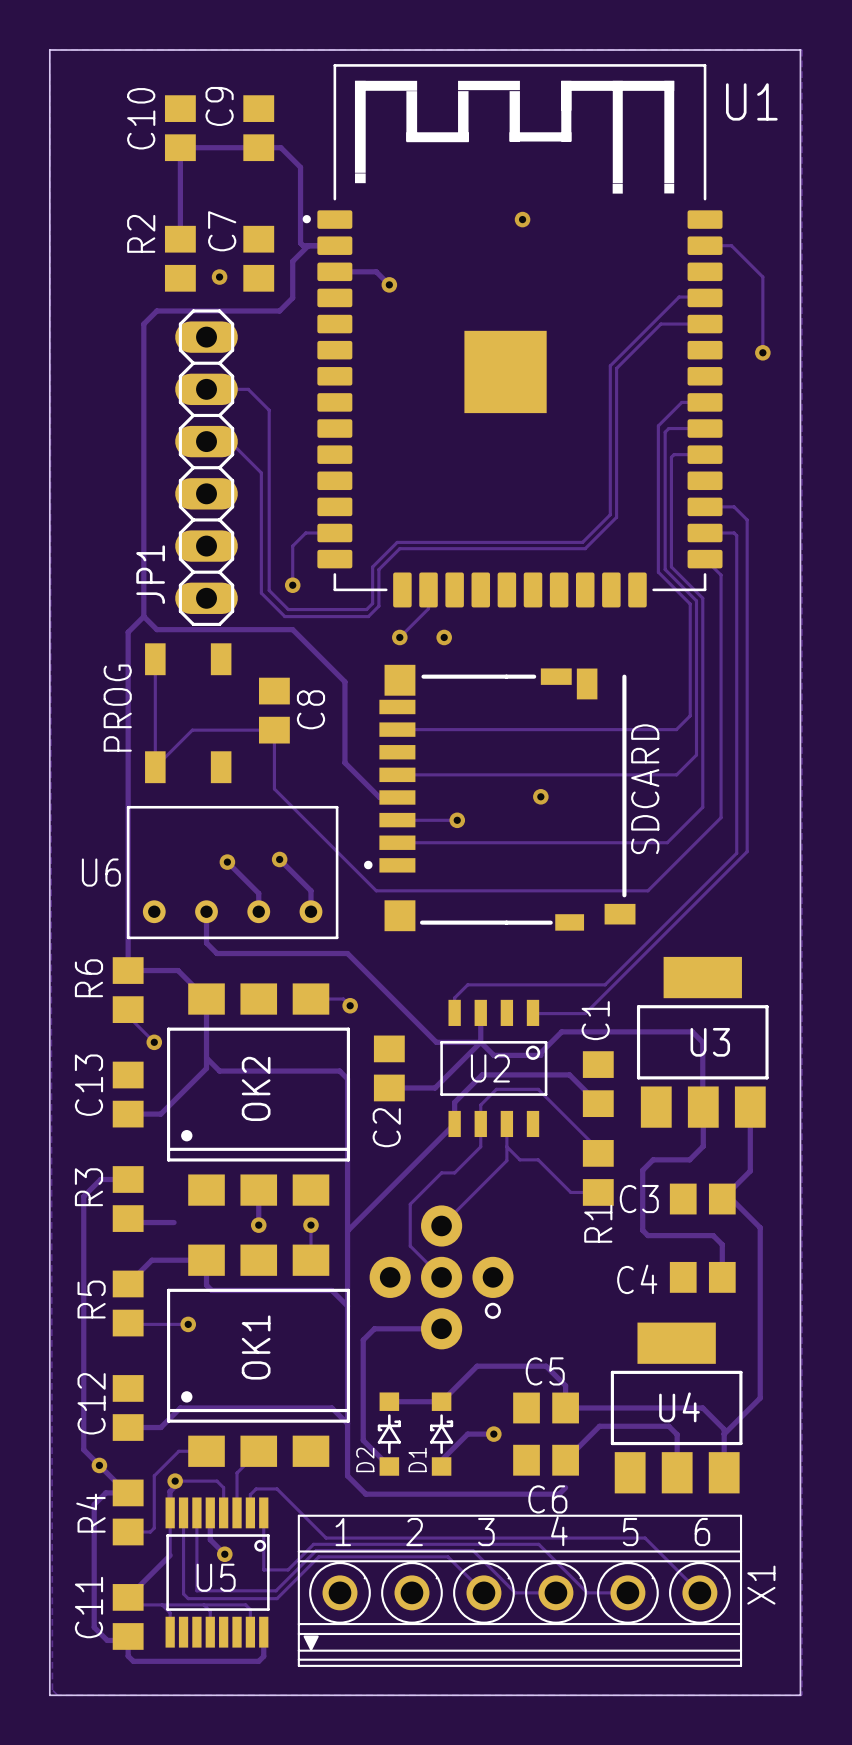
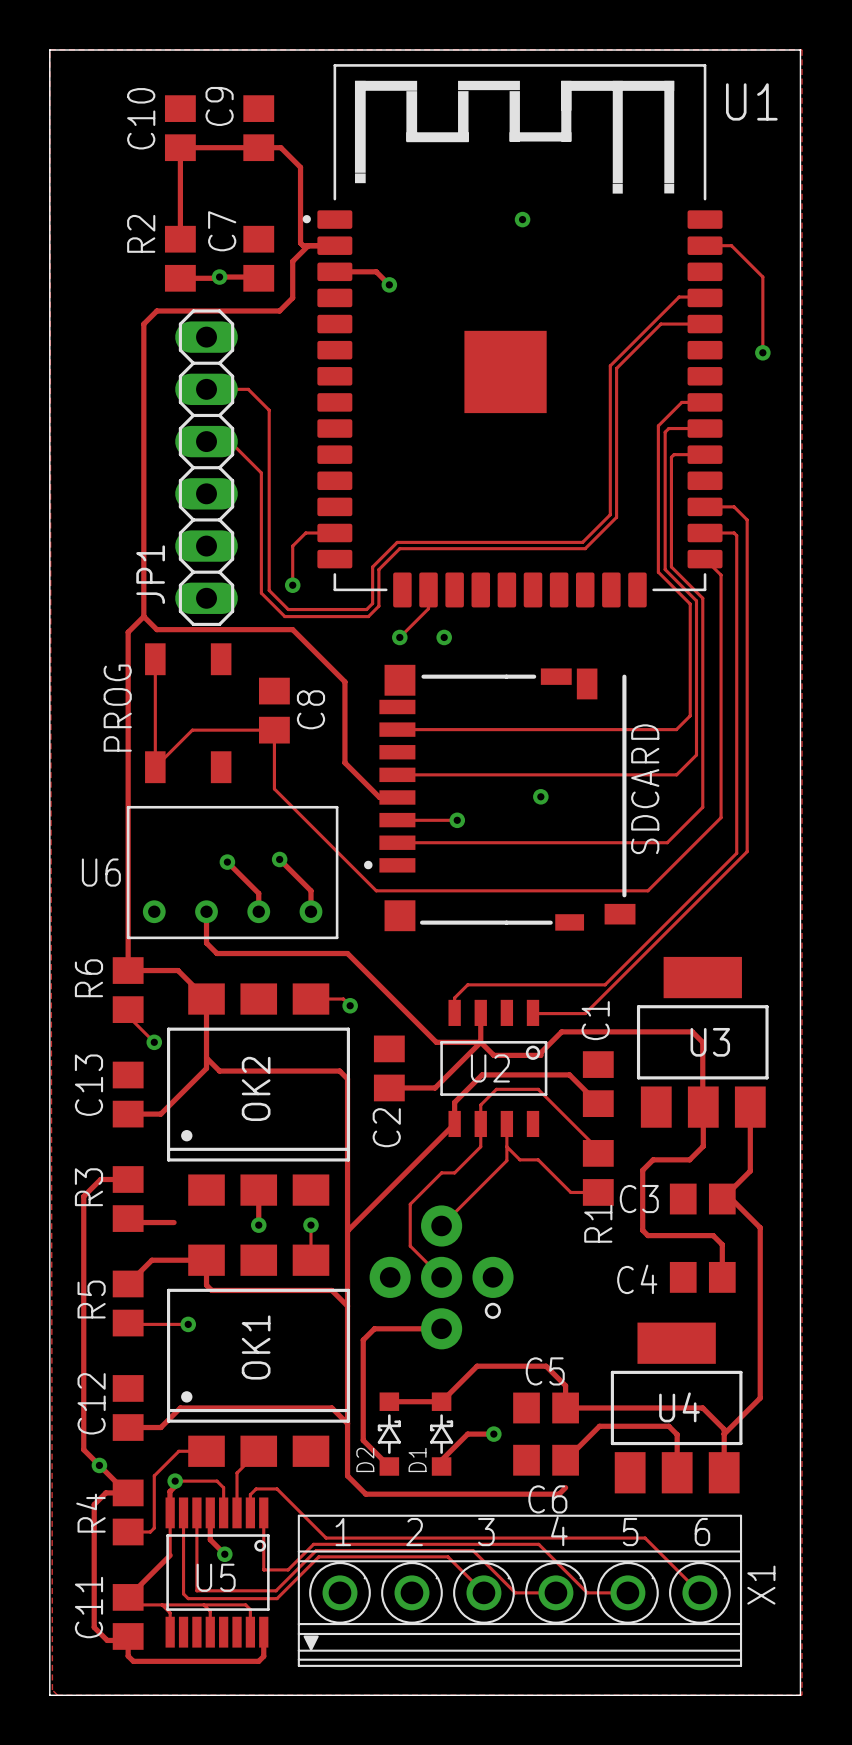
track: none -> (180, 278) (258, 278)

